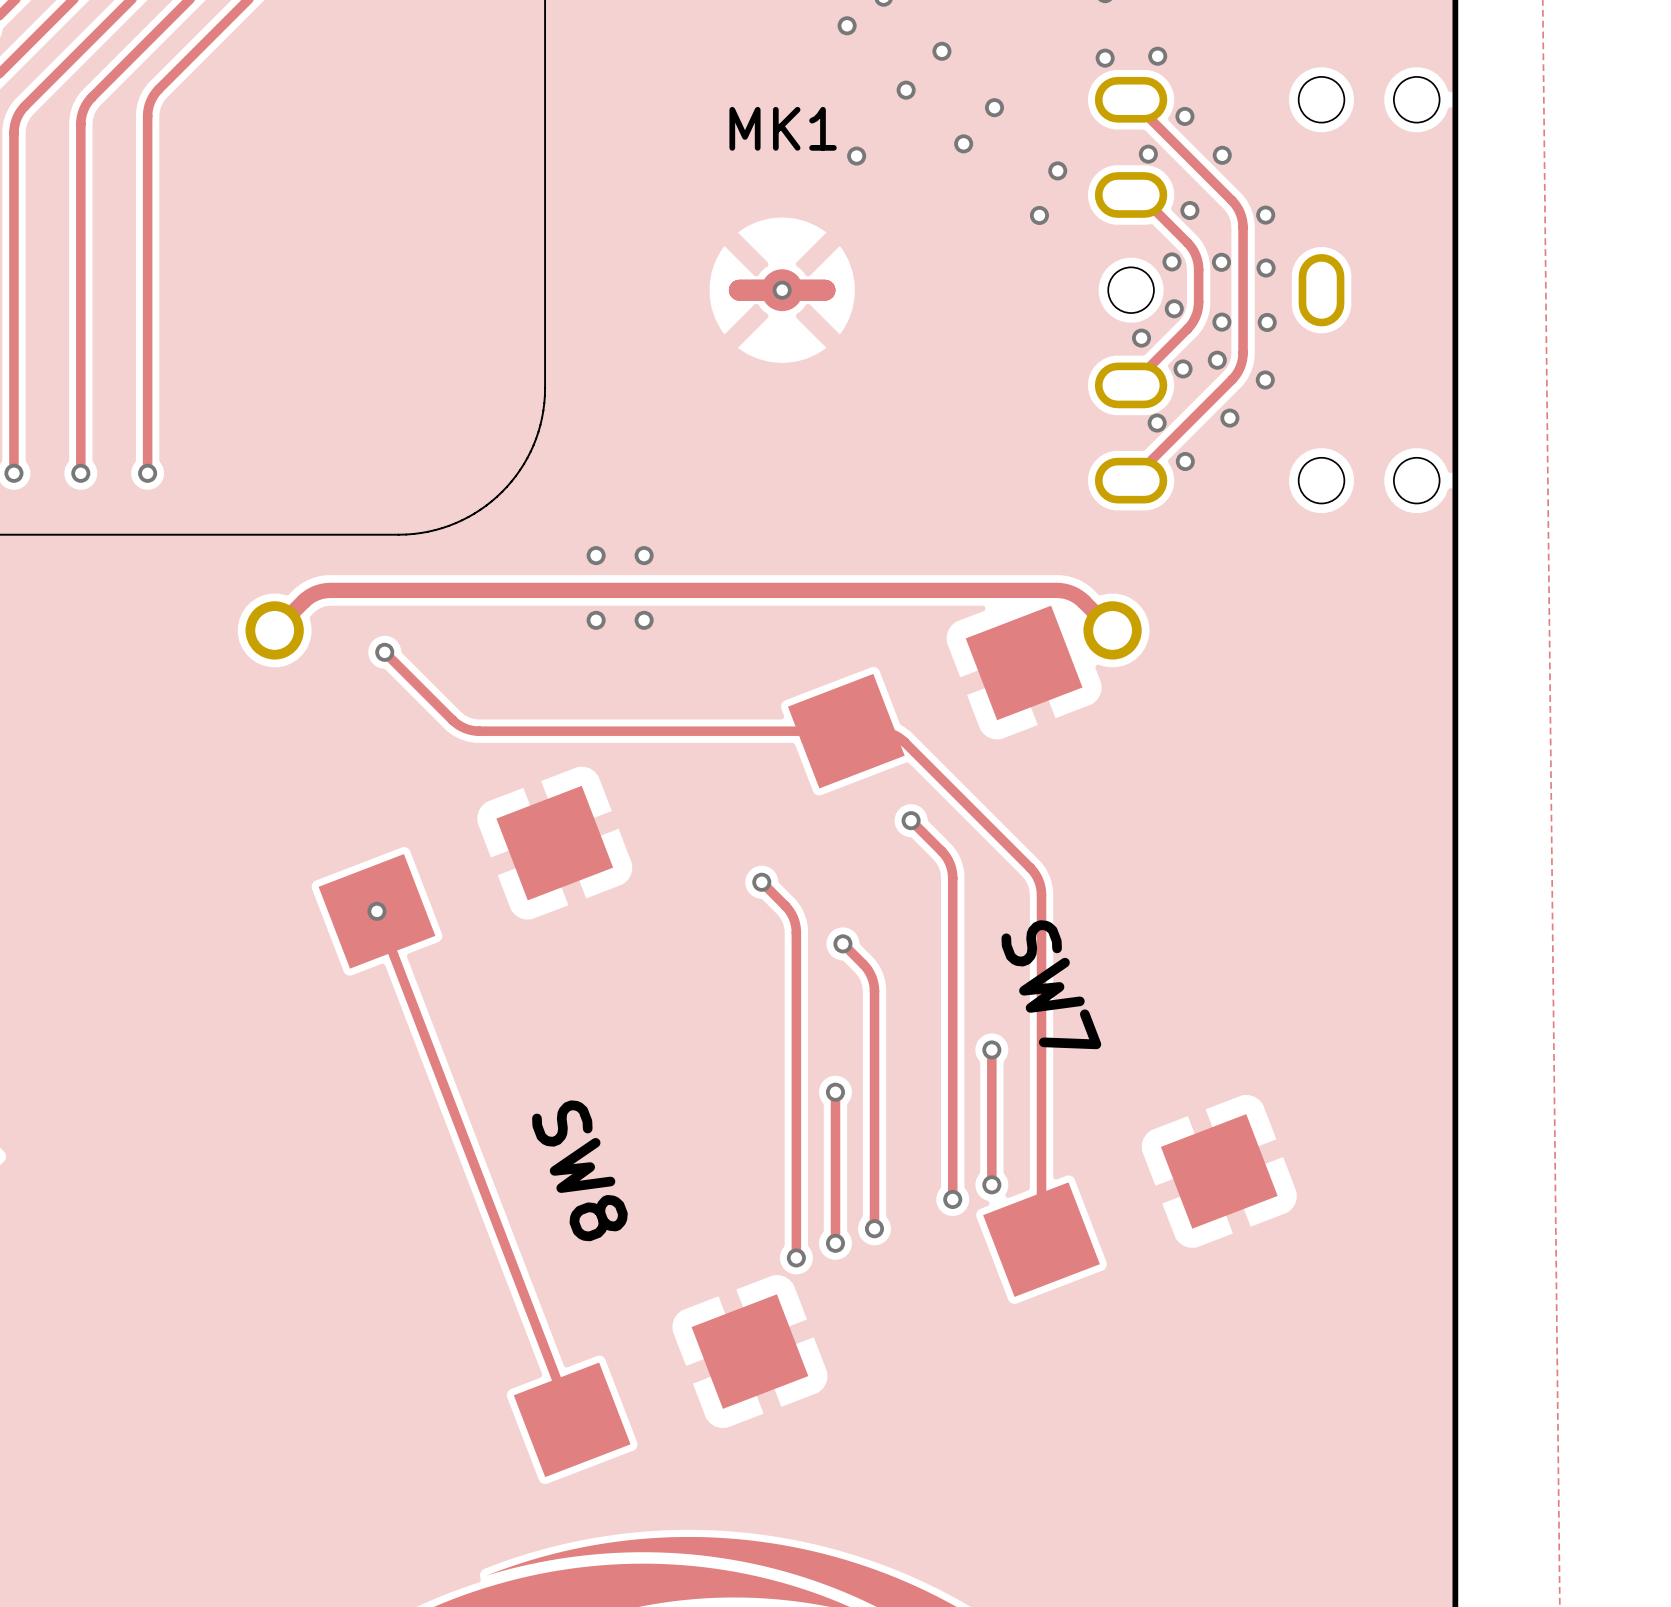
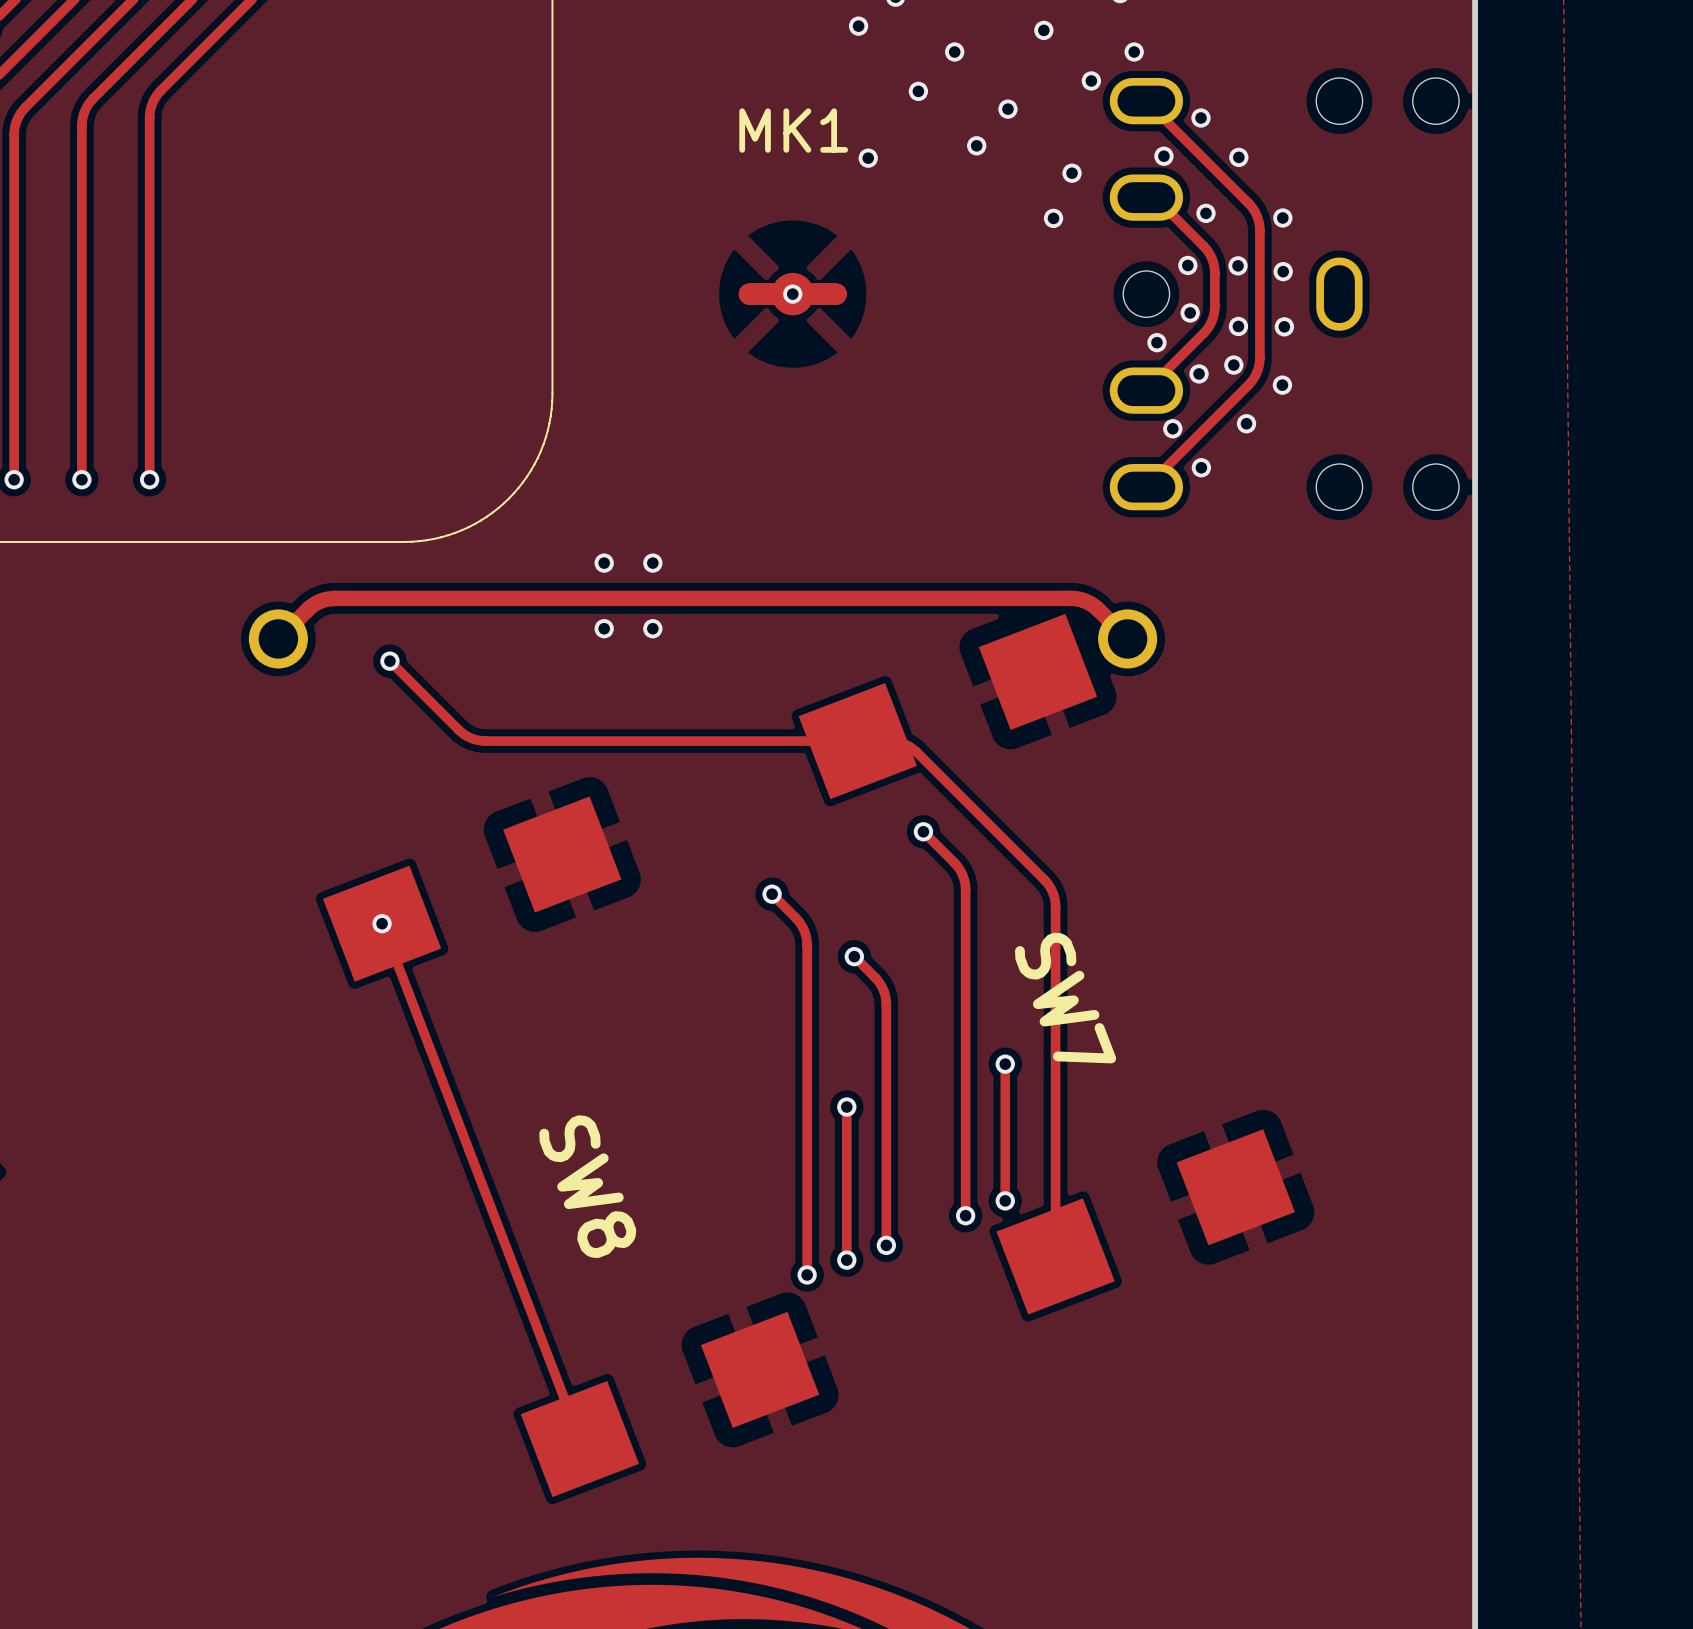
via: none -> (1043, 30)
via: (1157, 56) -> none
via position: (1105, 58) -> (1134, 52)
via: none -> (1091, 80)

